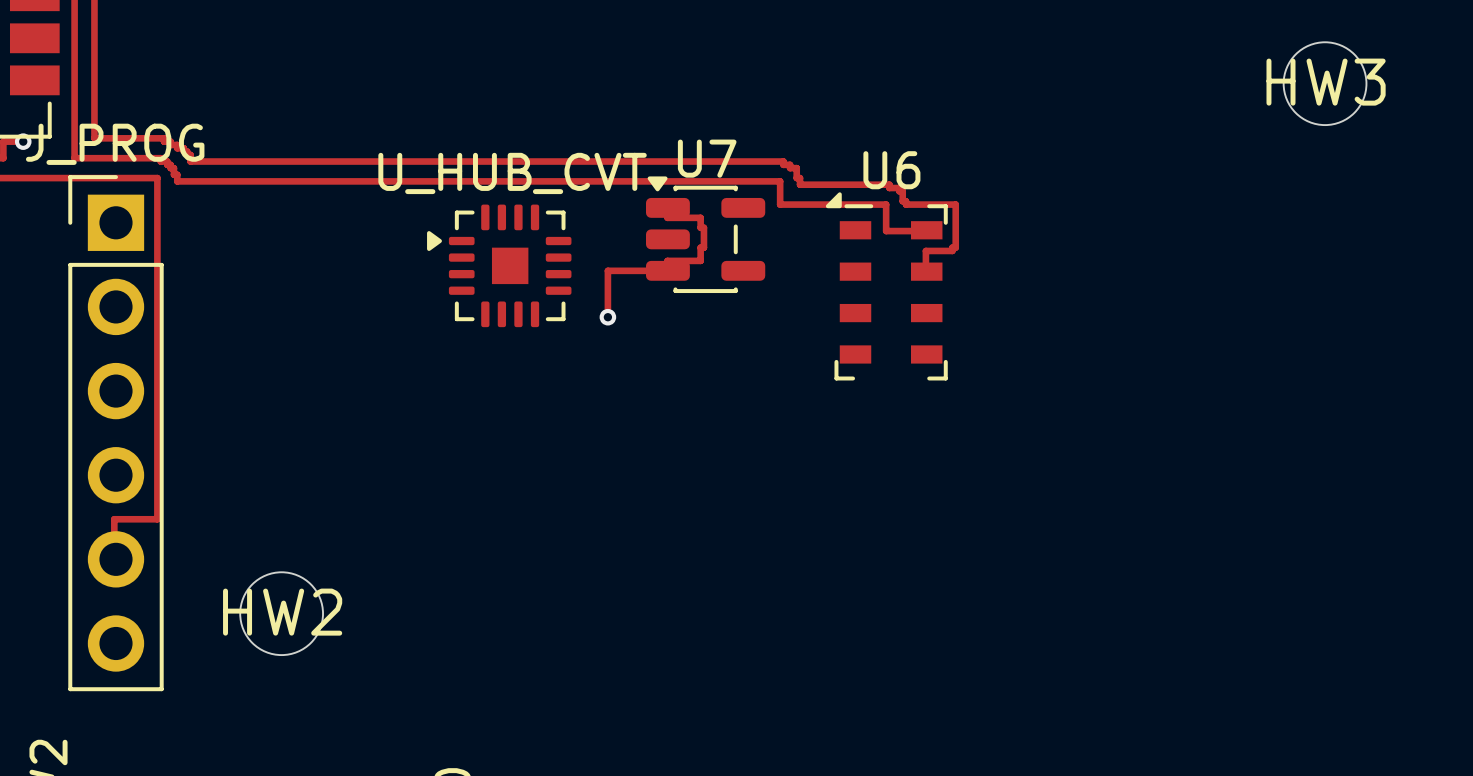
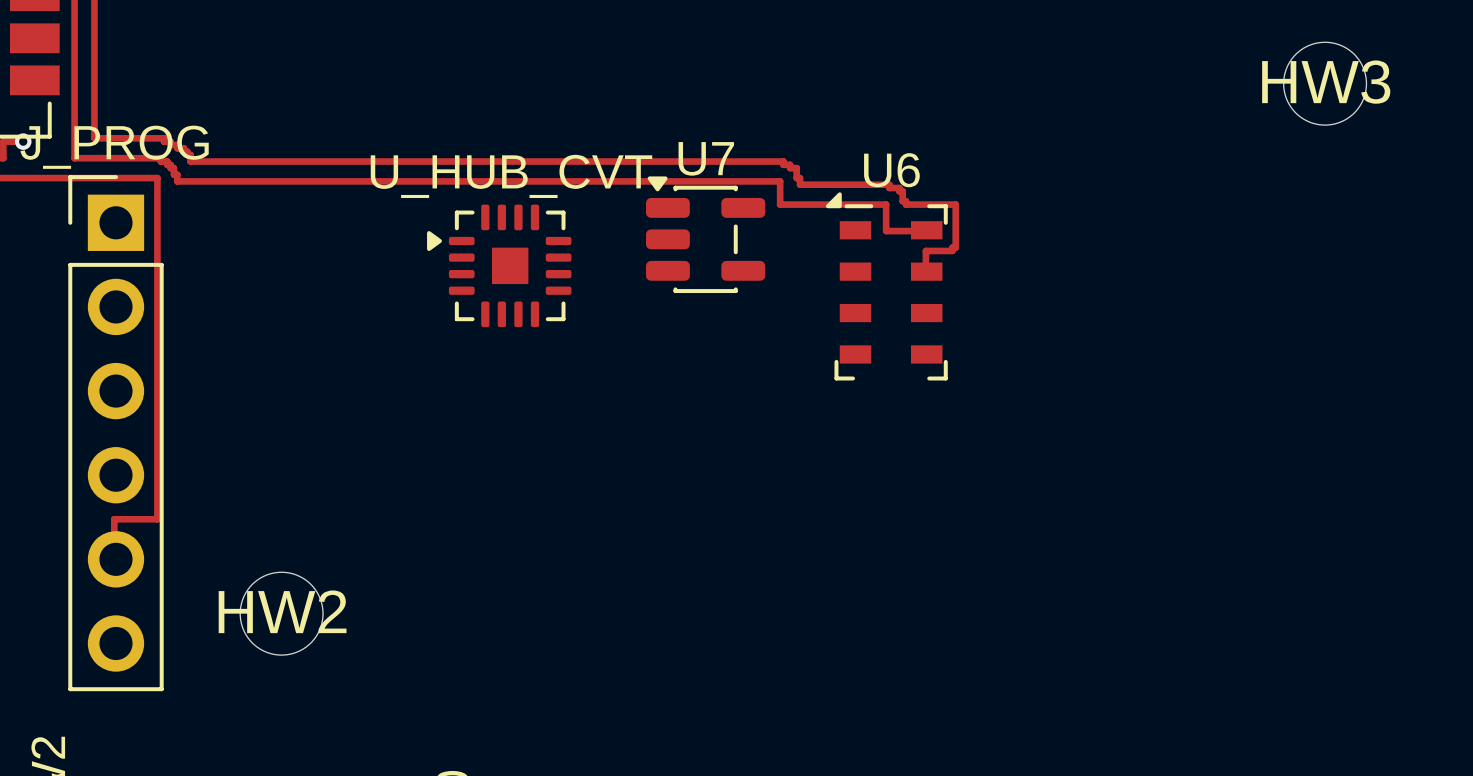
track: (667, 207) (667, 217) (700, 217) (700, 227) (703, 227) (703, 247) (700, 247) (700, 260) (667, 260) (667, 270) (607, 270) (607, 317) -> none
via: (607, 317) -> none

